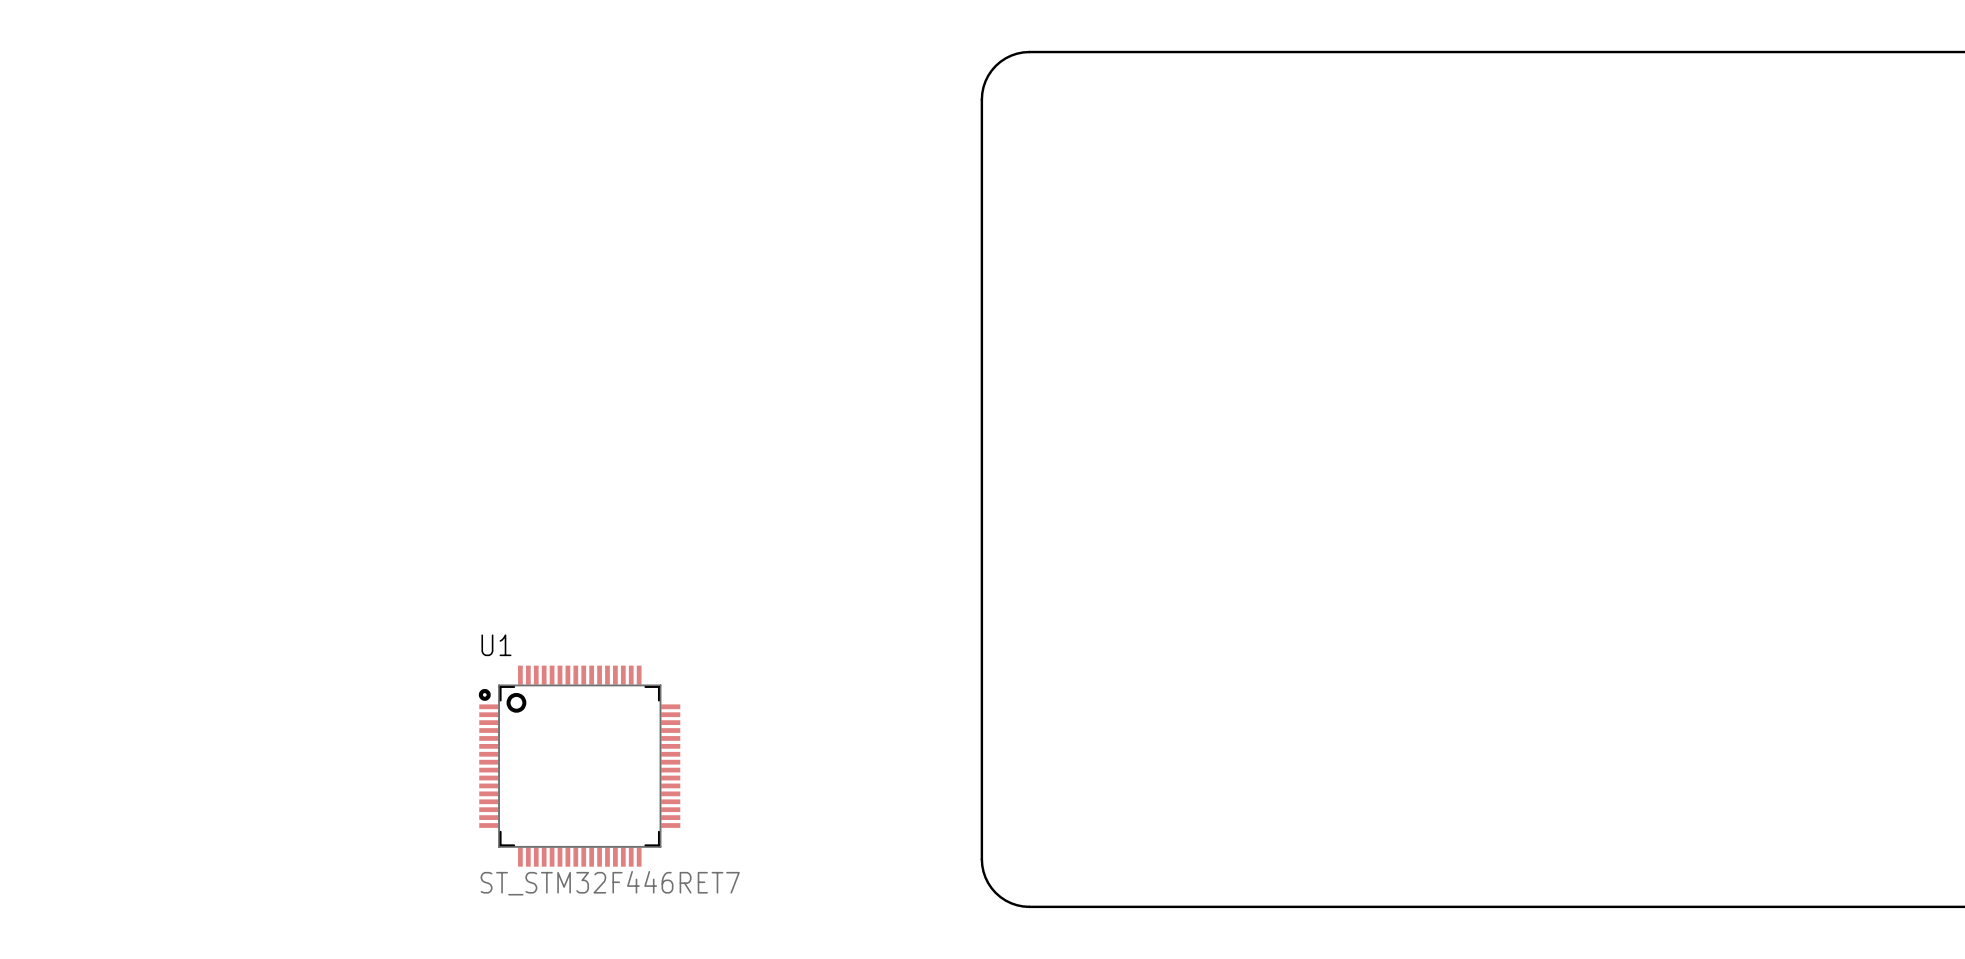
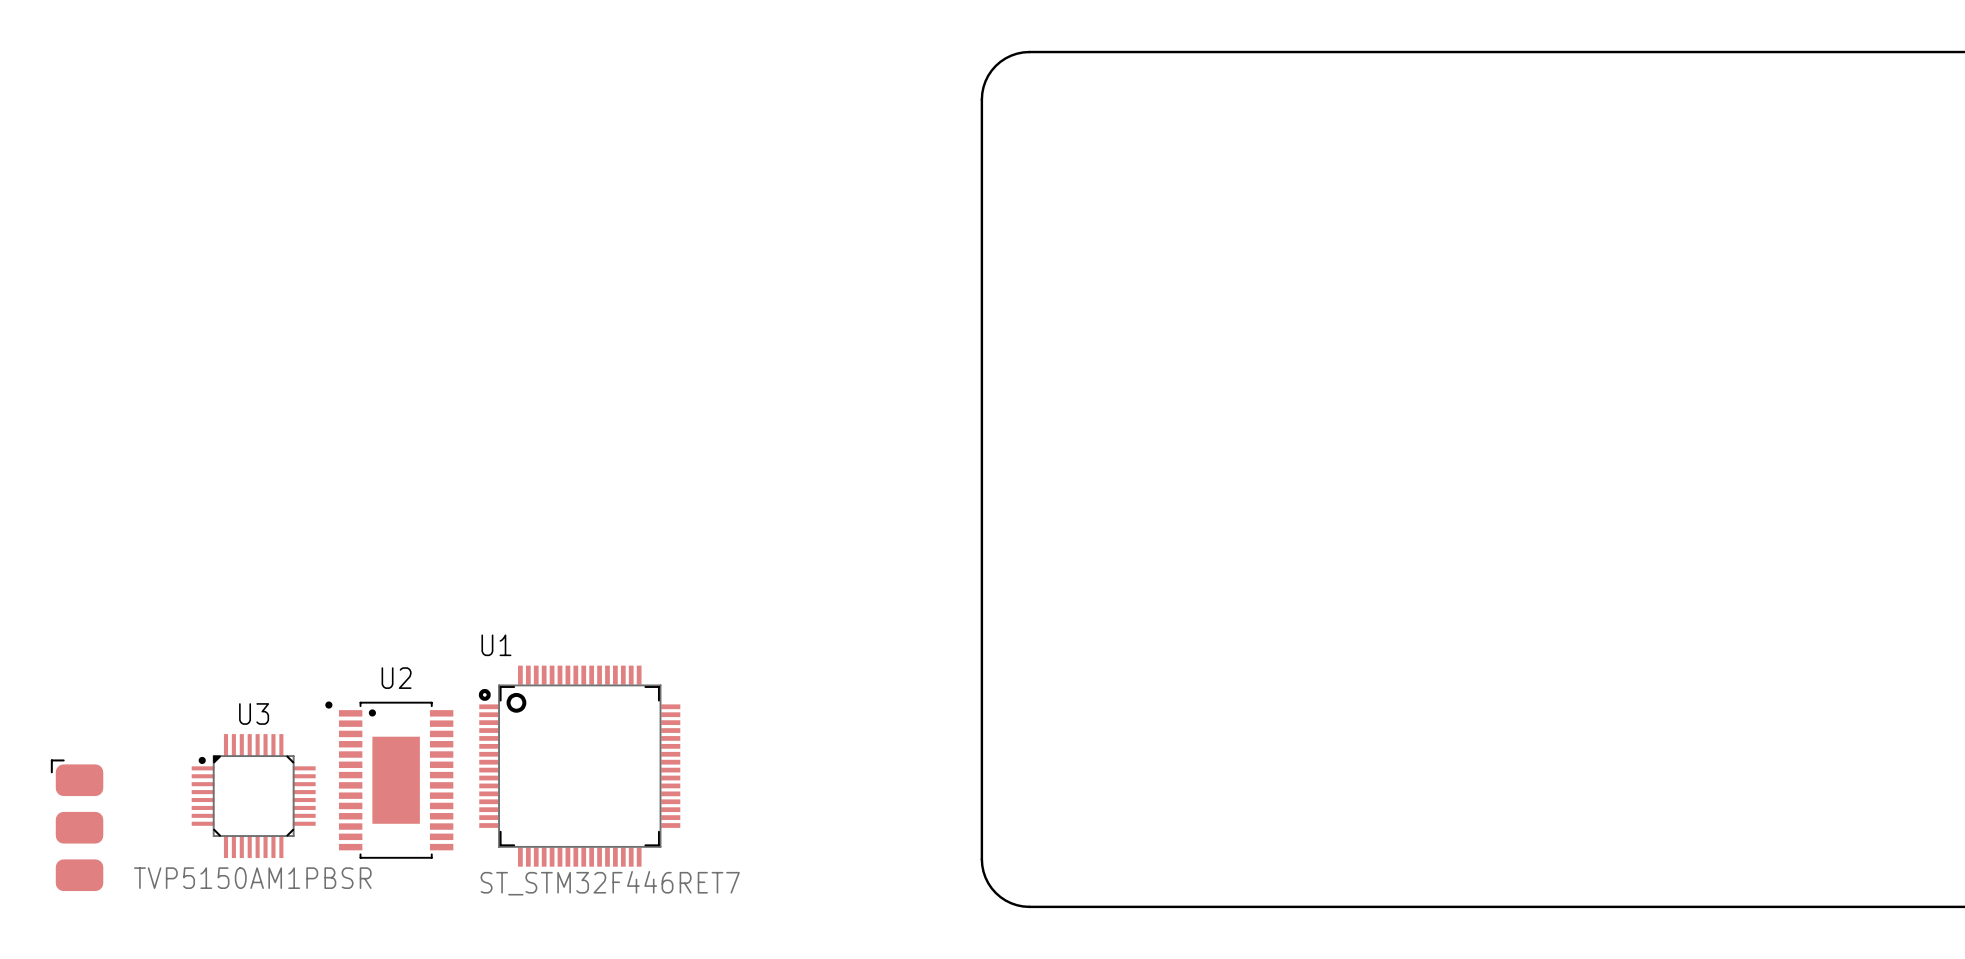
U2: none -> (389, 780)
U3: none -> TVP5150AM1PBSR (253, 796)
part: none -> (77, 825)

